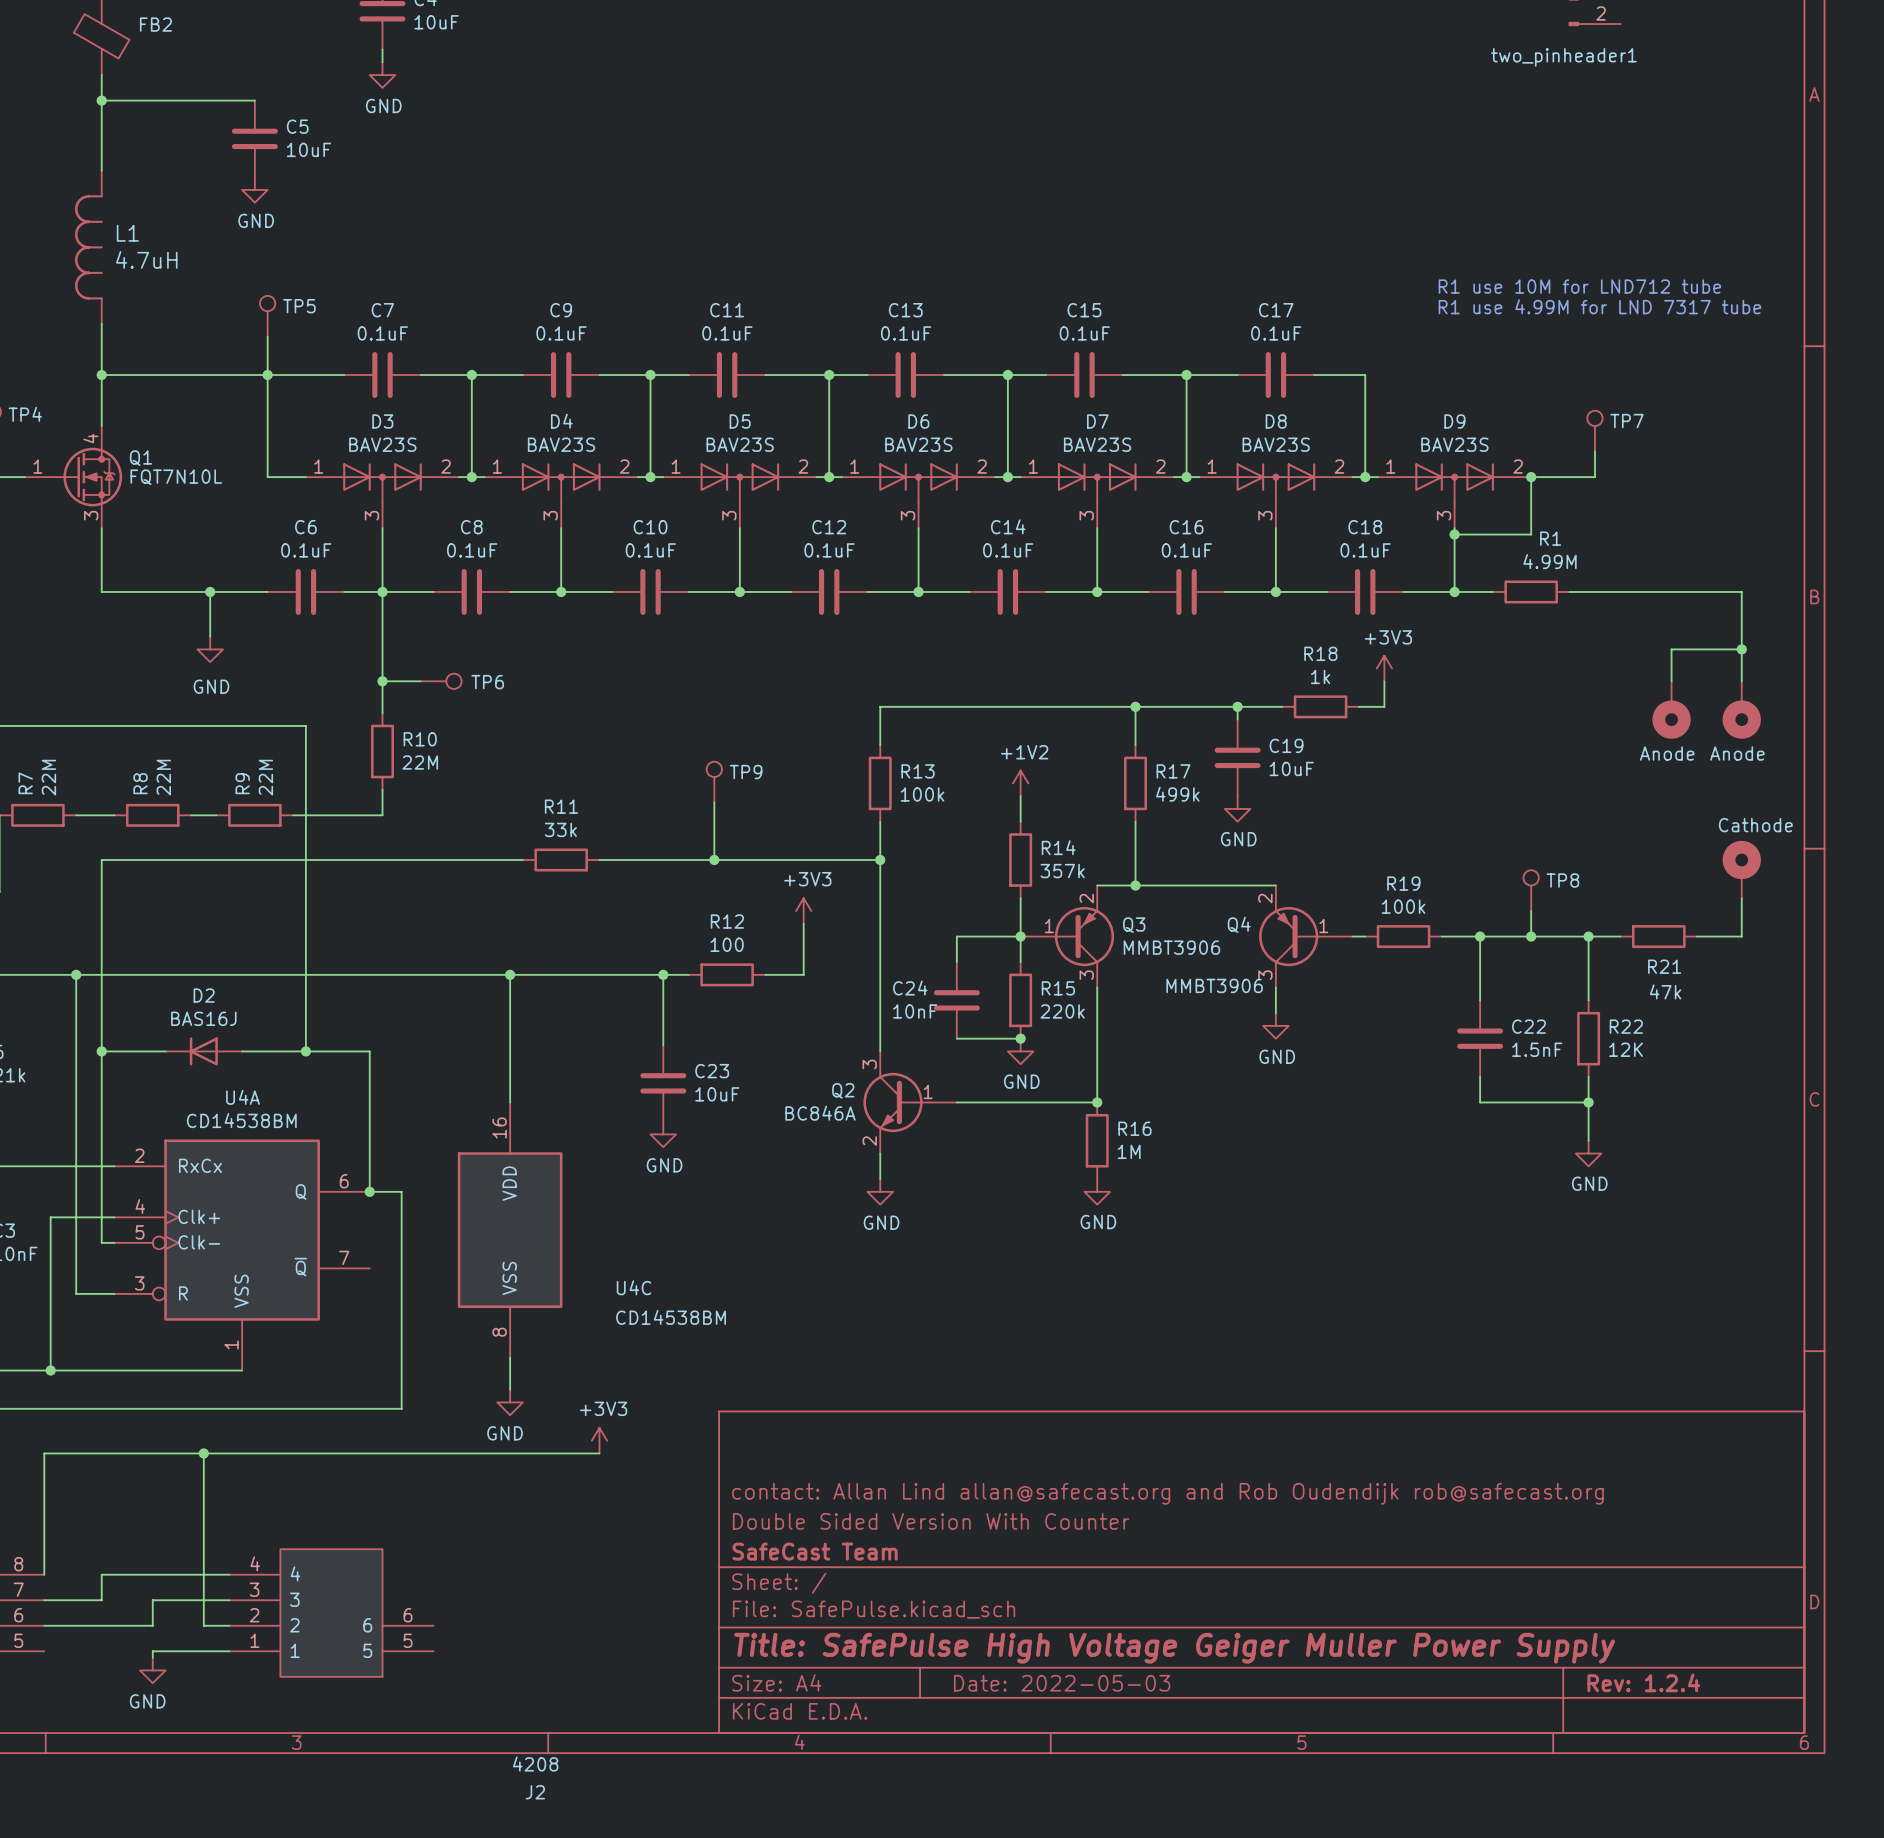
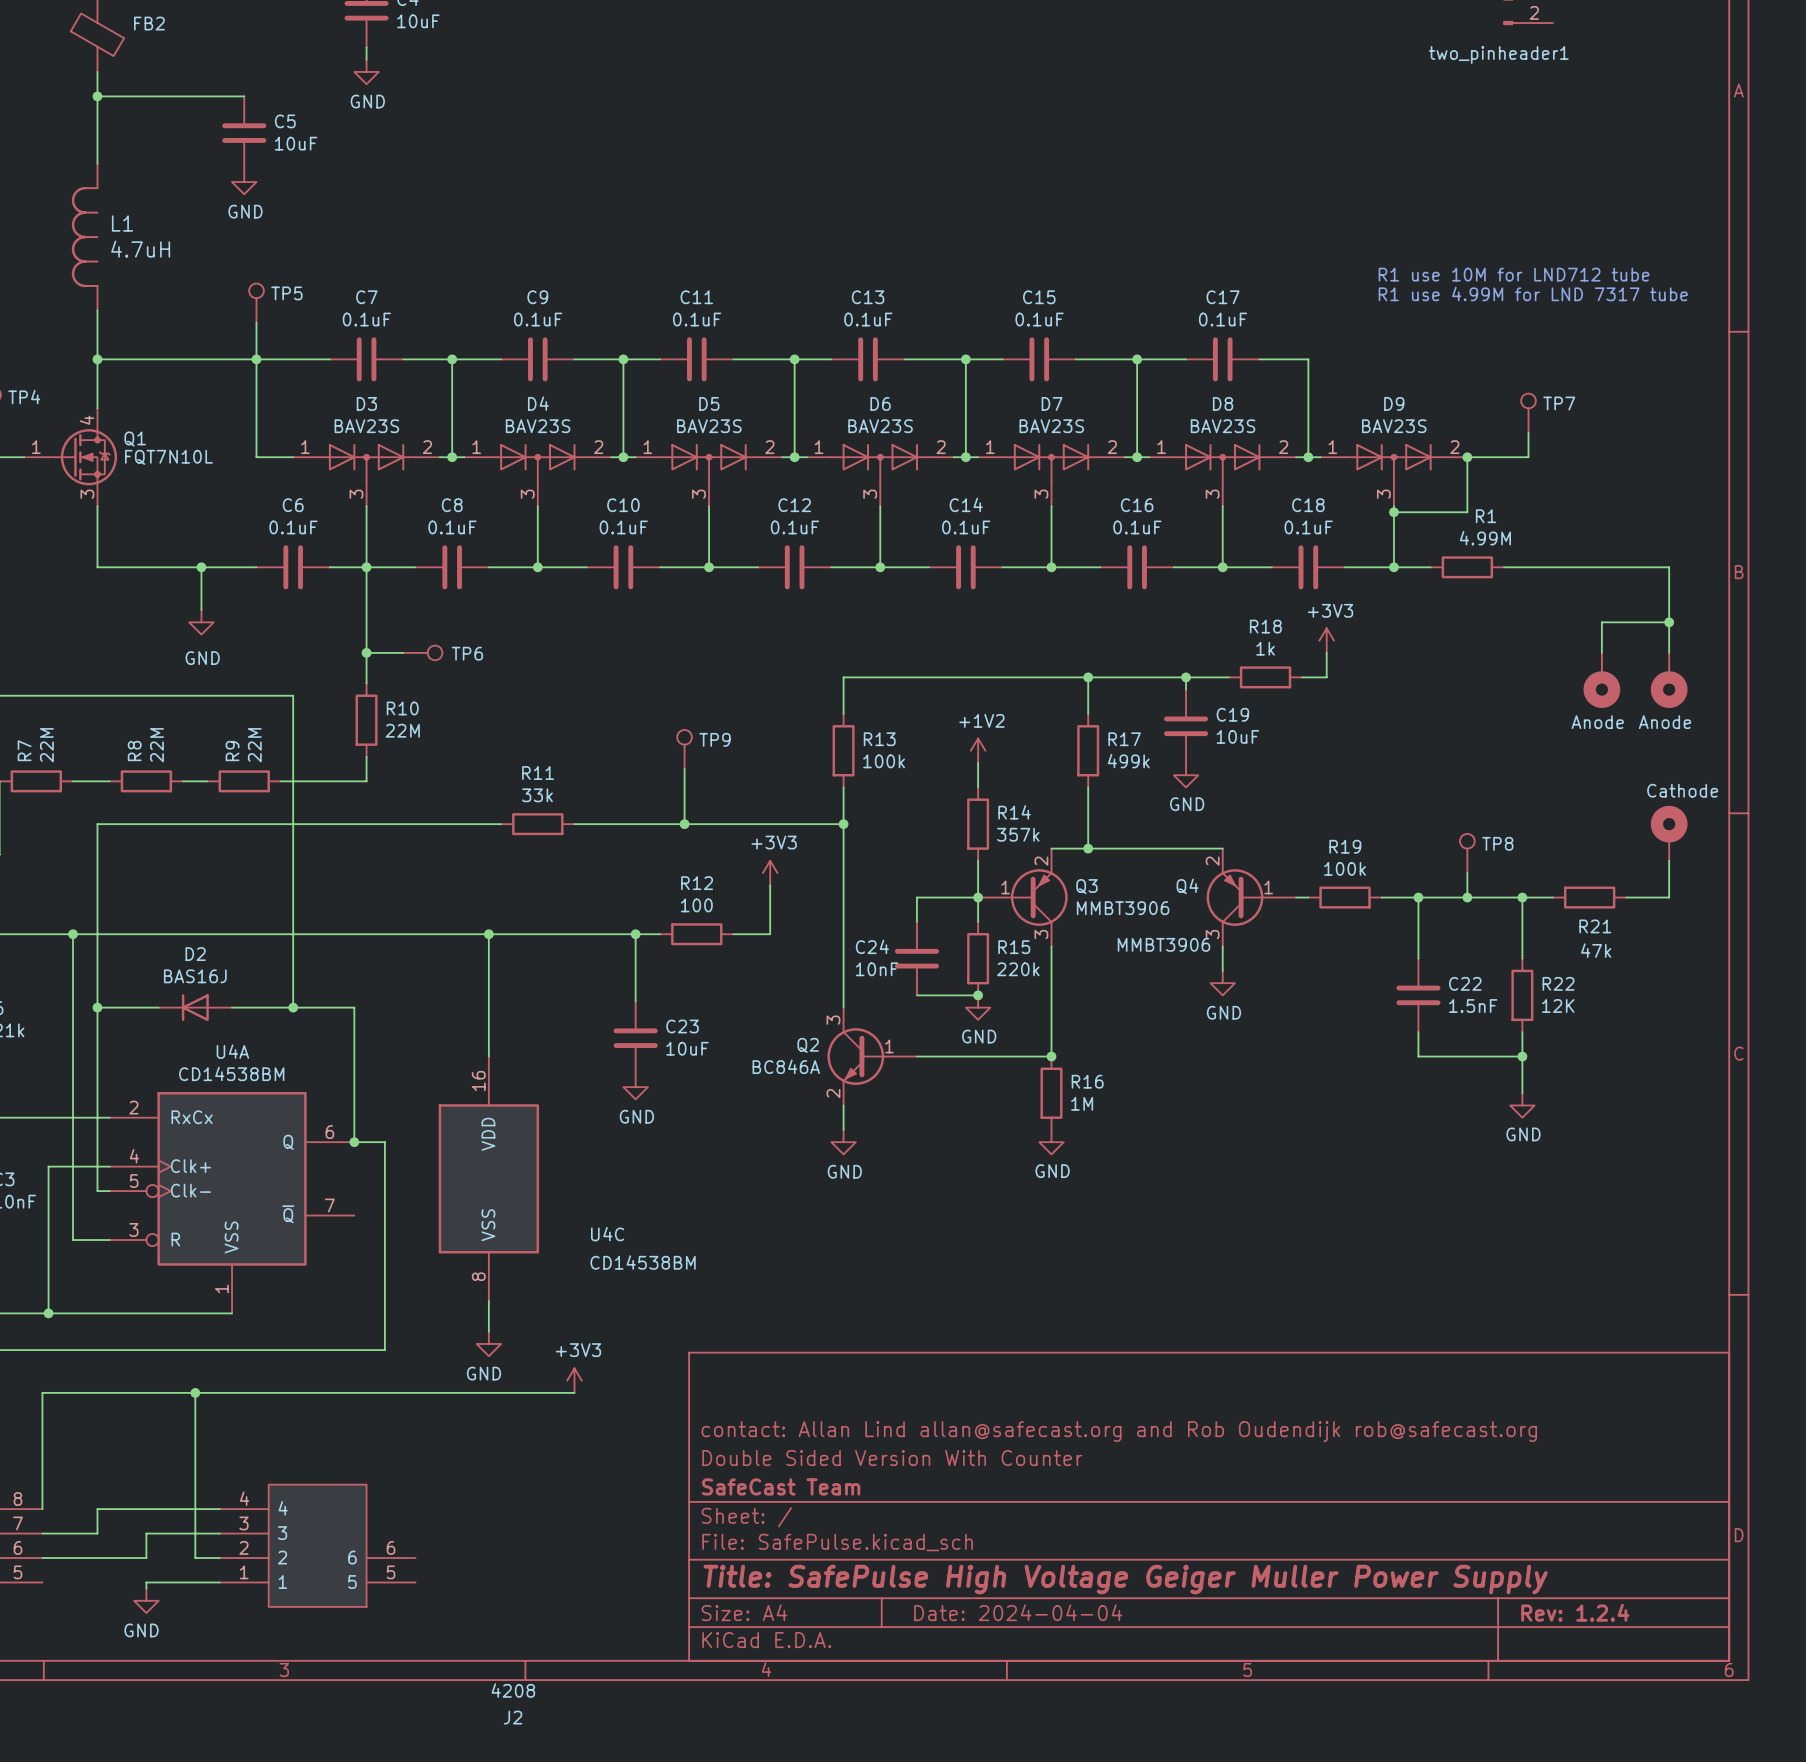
title block: Date: 2022-05-03 (1062, 1683) -> Date: 2024-04-04 (1018, 1612)

